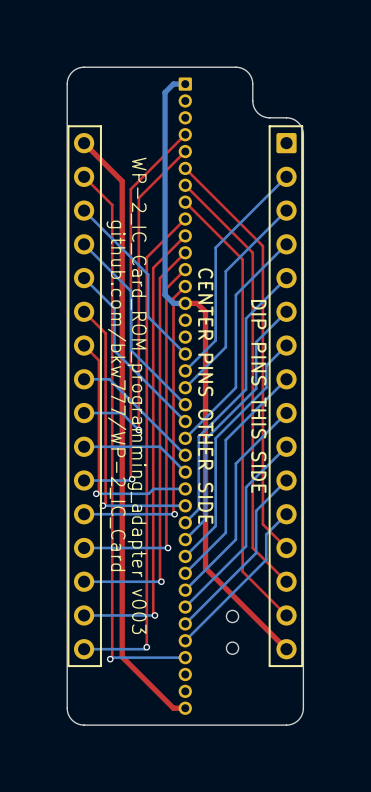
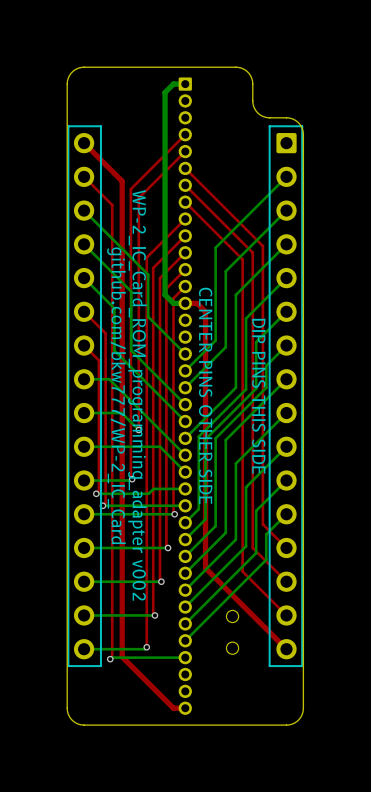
text: WP-2_IC_Card_ROM_programming_adapter v003 (137, 395) -> WP-2_IC_Card_ROM_programming_adapter v002 (137, 395)

